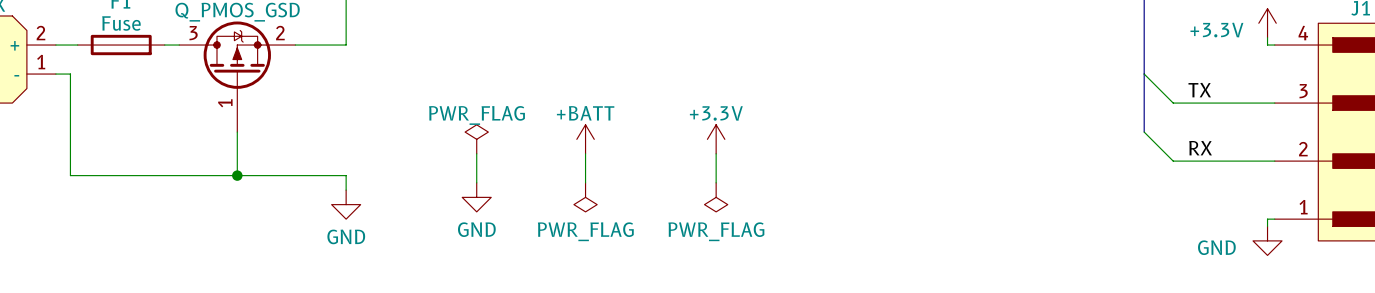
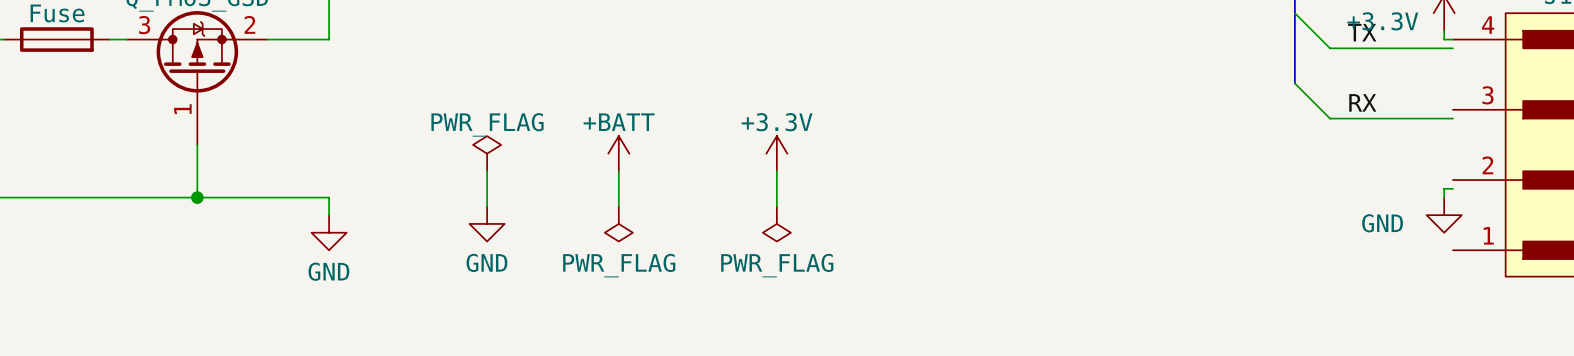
wire: (1144, 74) (1173, 103) (1274, 103) -> (1294, 13) (1330, 48) (1452, 48)
bus: (1144, 81) (1144, 132) -> none
label position: TX (1199, 90) -> TX (1362, 32)
wire: (1144, 132) (1173, 161) (1274, 161) -> (1294, 83) (1330, 118) (1452, 118)
label position: RX (1200, 148) -> RX (1362, 102)
wire: (1274, 219) (1267, 219) (1267, 226) -> (1452, 188) (1444, 188) (1444, 197)
power symbol position: GND (1267, 240) -> GND (1444, 215)

